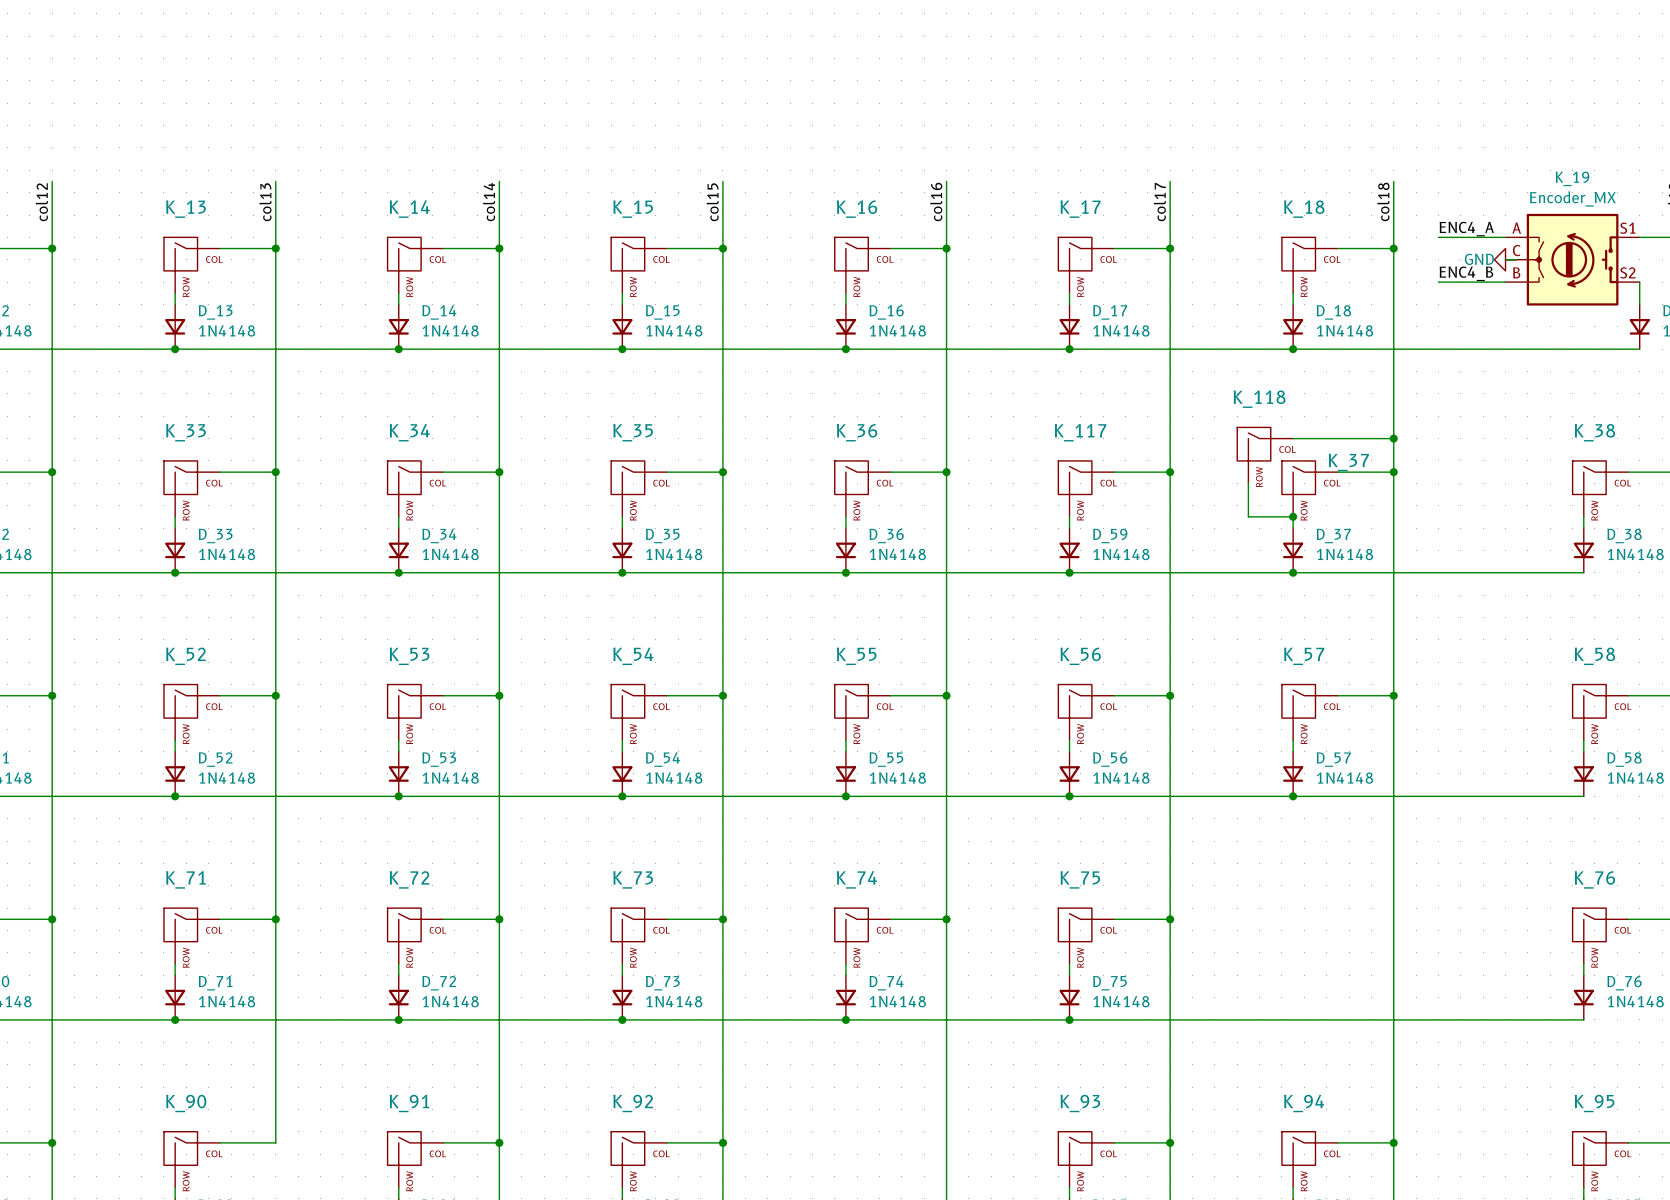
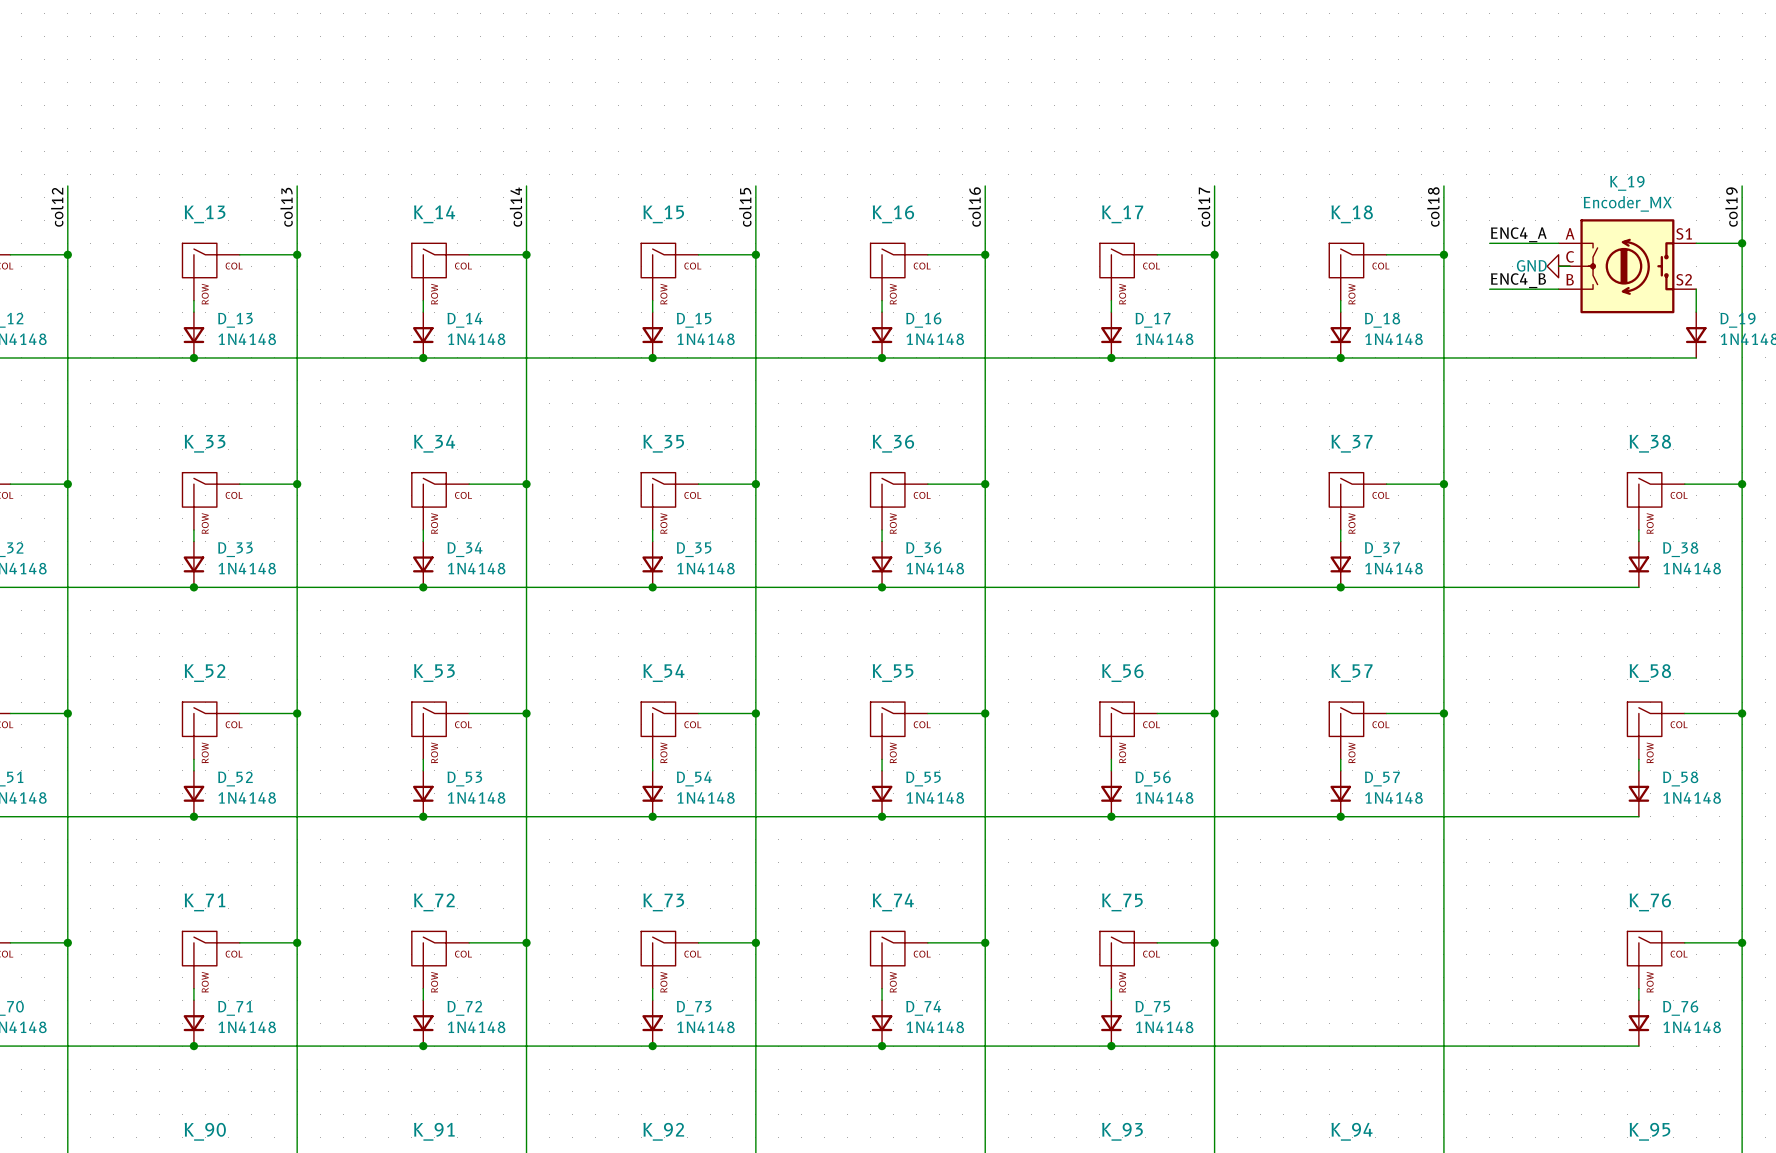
wire: (1293, 438) (1393, 438) -> none
junction: (1393, 438) -> none
K_118: (1265, 455) -> none
K_37 name position: K_37 (1348, 462) -> K_37 (1352, 443)
wire: (1114, 472) (1170, 472) -> none
junction: (1170, 472) -> none
wire: (1248, 483) (1248, 516) (1293, 516) -> none
K_117: (1086, 488) -> none
wire: (1069, 516) (1069, 528) -> none
junction: (1293, 516) -> none
D_59: 1N4148 (1069, 550) -> none
junction: (1069, 572) -> none

